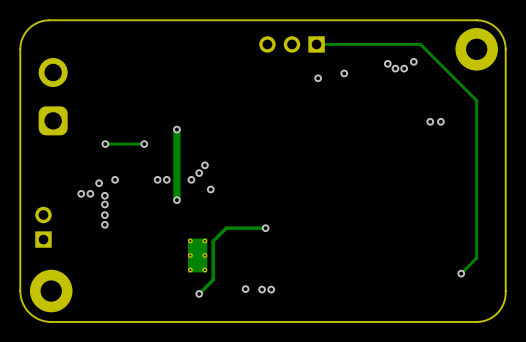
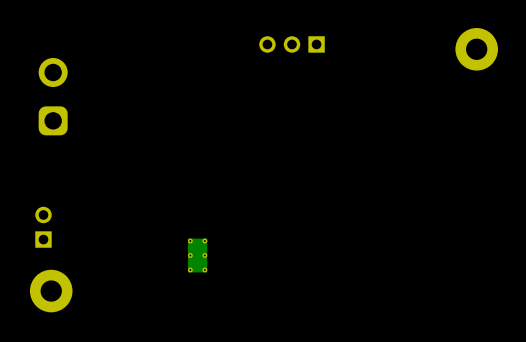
track: (316, 44) (420, 44) (476, 100) (476, 258) (461, 273) -> none
via: (413, 61) -> none
via: (387, 63) -> none
via: (395, 68) -> none
via: (404, 68) -> none
via: (344, 73) -> none
via: (318, 78) -> none
via: (430, 121) -> none
via: (440, 121) -> none
track: (176, 129) (176, 200) -> none
via: (176, 129) -> none
via: (105, 144) -> none
track: (144, 144) (105, 144) -> none
via: (144, 144) -> none
via: (204, 165) -> none
via: (199, 173) -> none
via: (115, 179) -> none
via: (157, 179) -> none
via: (166, 179) -> none
via: (191, 179) -> none
via: (99, 183) -> none
via: (210, 189) -> none
via: (81, 193) -> none
via: (90, 193) -> none
via: (104, 195) -> none
via: (176, 200) -> none
via: (104, 204) -> none
via: (104, 215) -> none
via: (104, 224) -> none
track: (265, 228) (226, 228) (213, 241) (213, 279) (199, 293) -> none
via: (265, 228) -> none
via: (461, 273) -> none
via: (245, 289) -> none
via: (262, 289) -> none
via: (271, 289) -> none
board edge: (505, 291) (505, 49) (501, 34) (491, 24) (476, 20) (49, 20) (34, 24) (24, 34) (20, 49) (20, 291) (25, 307) (37, 318) (51, 321) (480, 321) (489, 318) (497, 312) (503, 304) (505, 291) -> none
via: (199, 293) -> none

